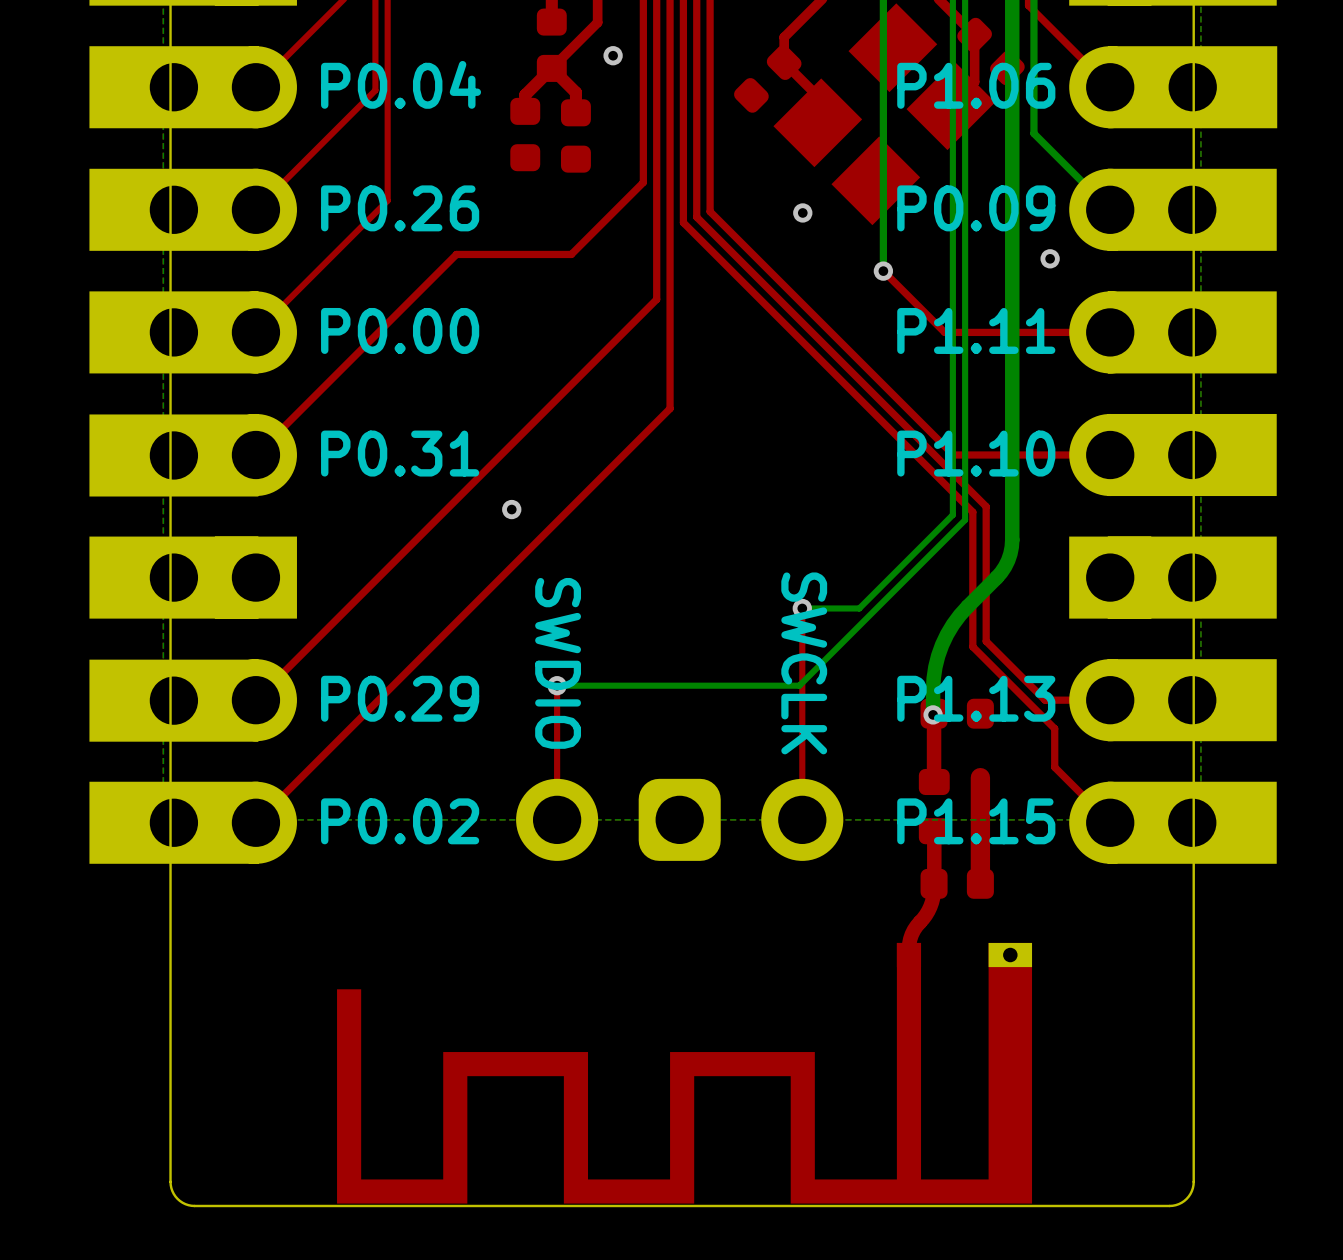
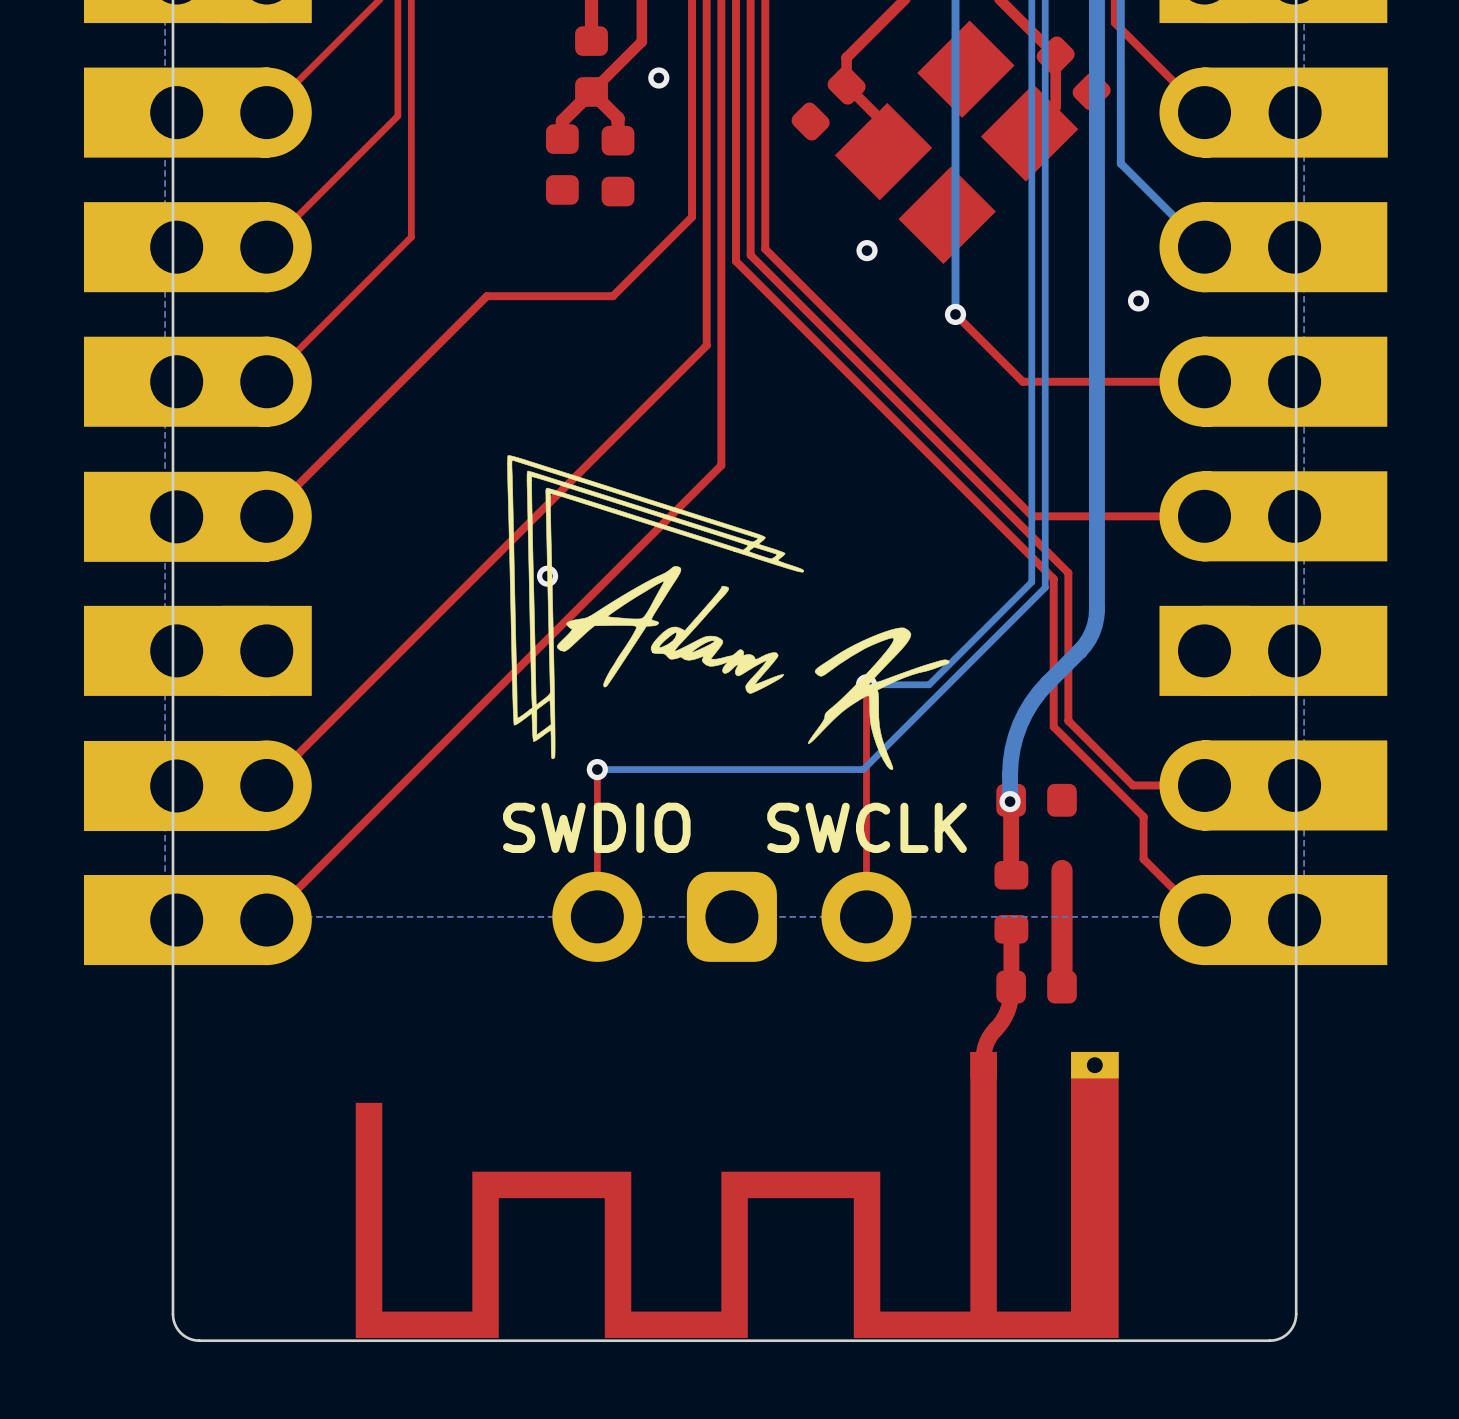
text: P0.04 (401, 84) -> none
text: P1.06 (976, 85) -> none
text: P0.26 (400, 208) -> none
text: P0.09 (976, 208) -> none
text: P0.00 (400, 330) -> none
text: P1.11 (976, 330) -> none
drawing: none -> [507, 455, 950, 770]
text: P0.31 (400, 453) -> none
text: P1.10 (976, 453) -> none
text rotation: 0° (558, 663) -> 90° counterclockwise (596, 827)
text rotation: 0° (804, 663) -> 90° counterclockwise (867, 827)
text: P0.29 (400, 698) -> none
text: P1.13 (976, 698) -> none
text: P0.02 (400, 821) -> none
text: P1.15 (976, 821) -> none

